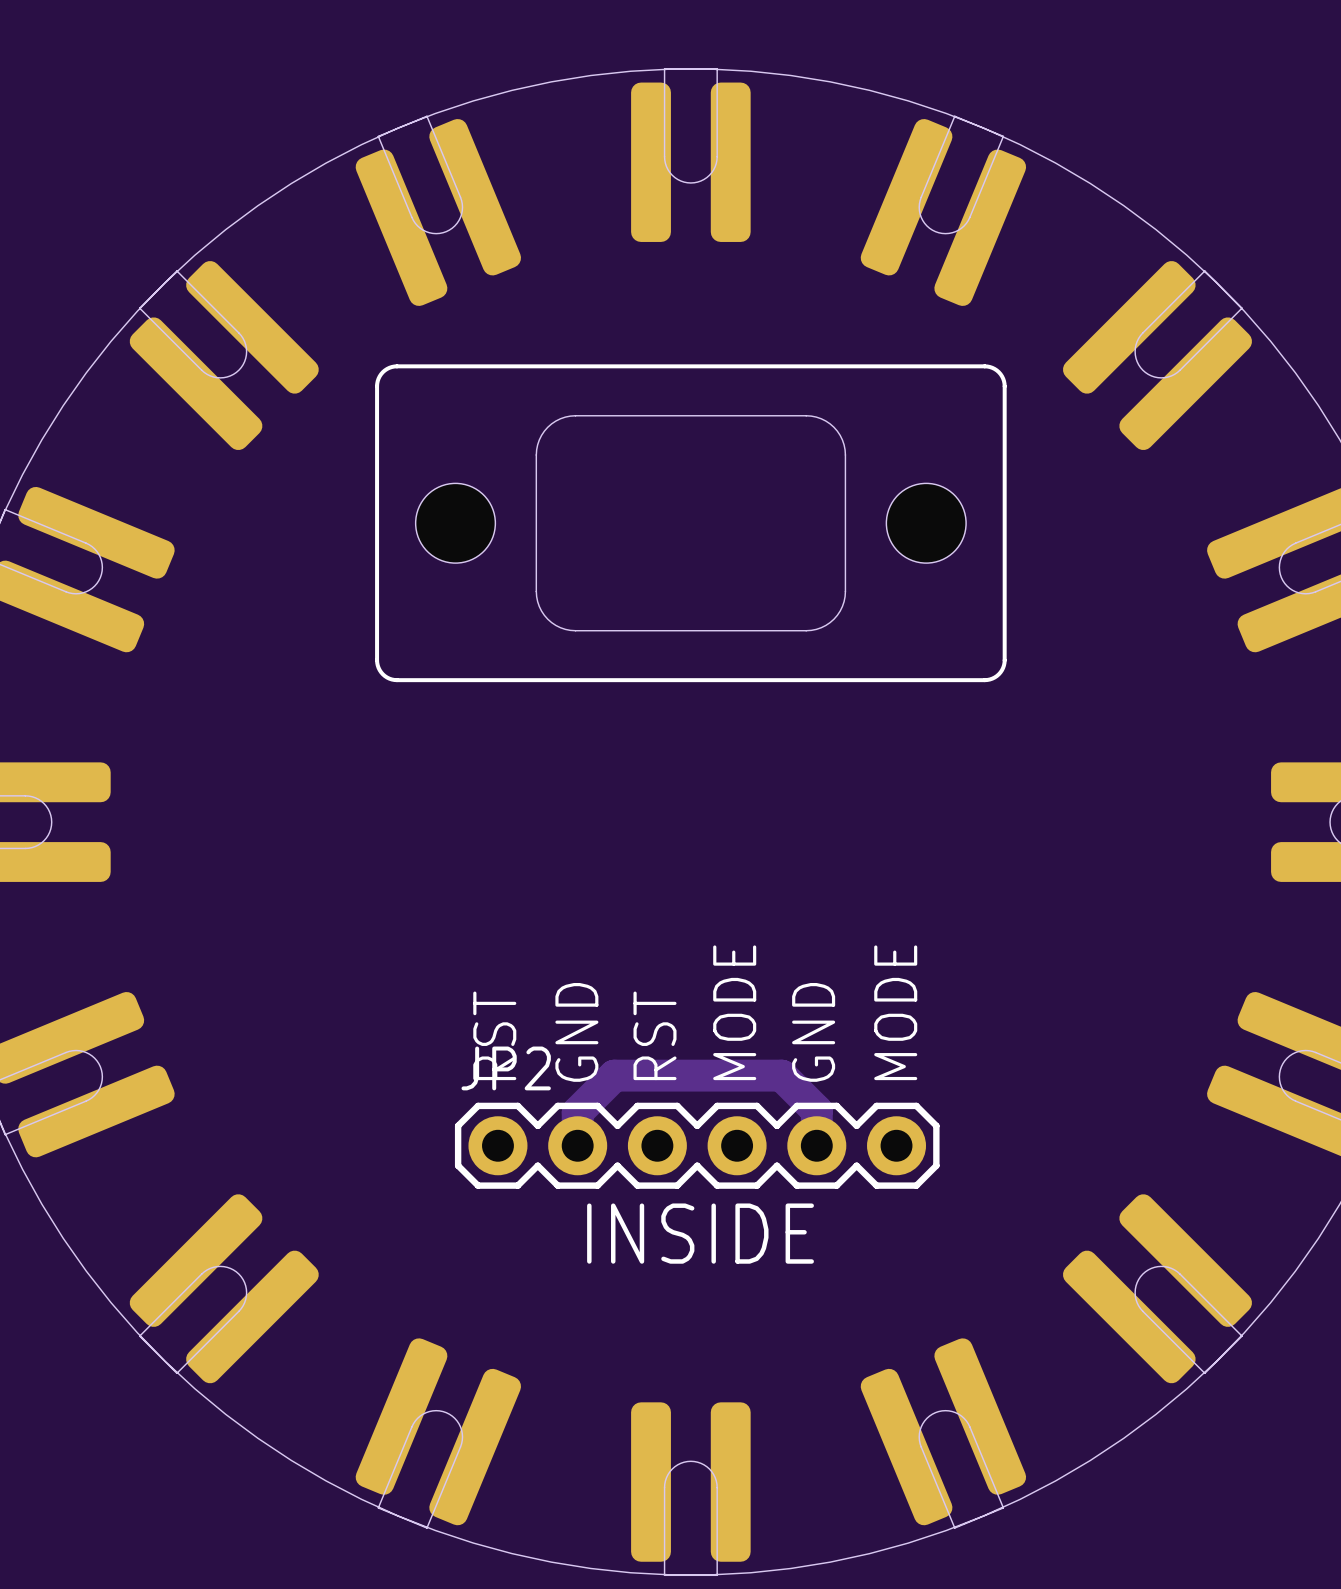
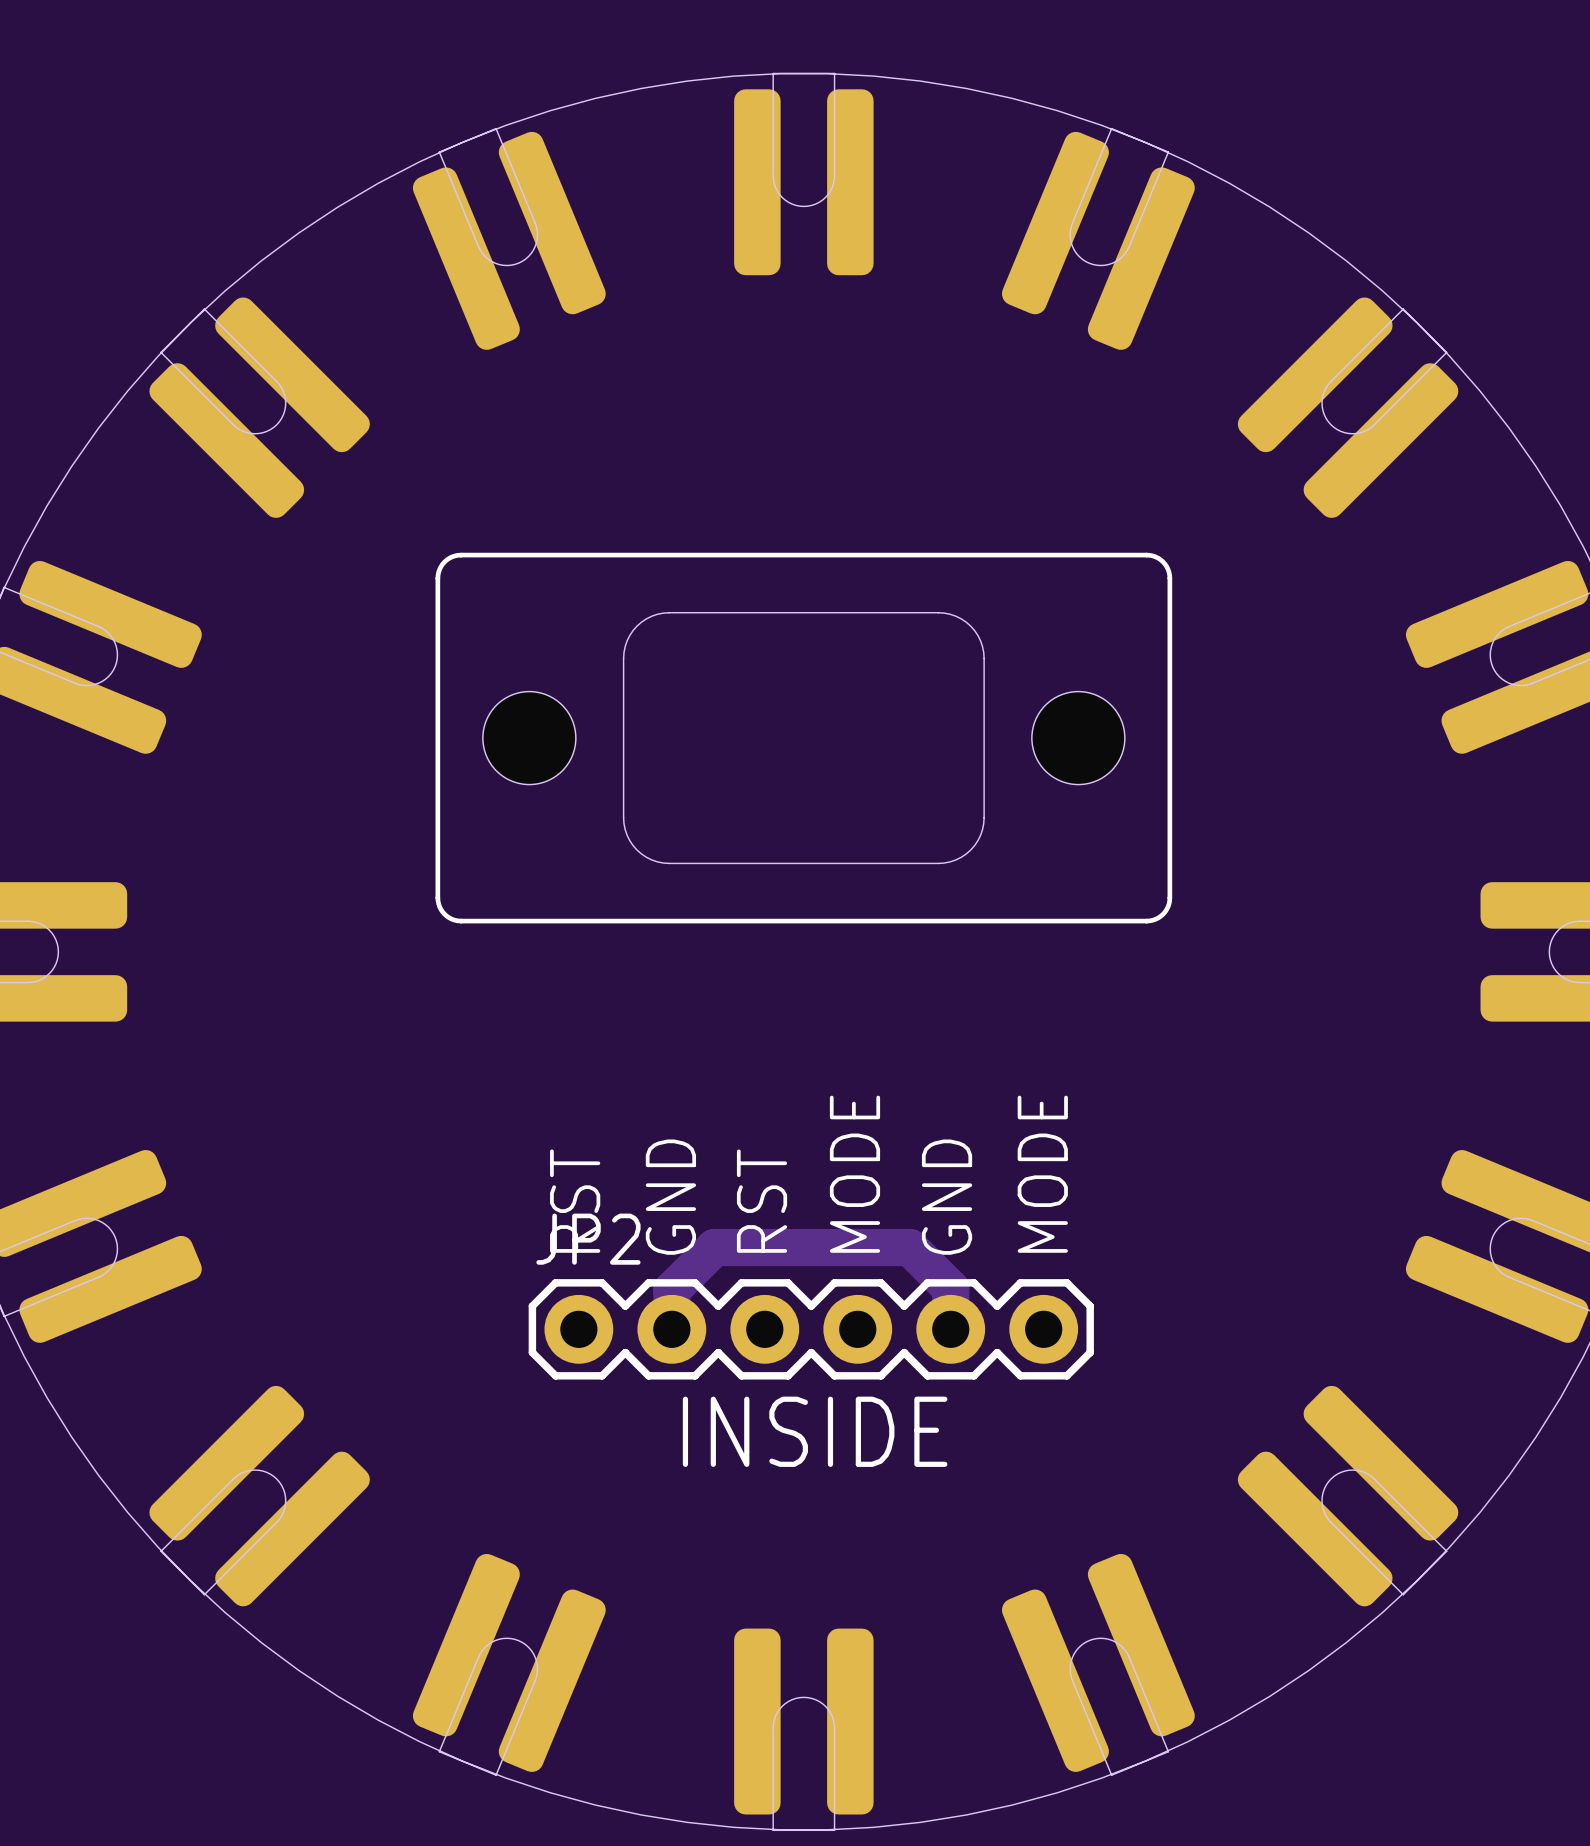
part position: (690, 523) -> (803, 738)

